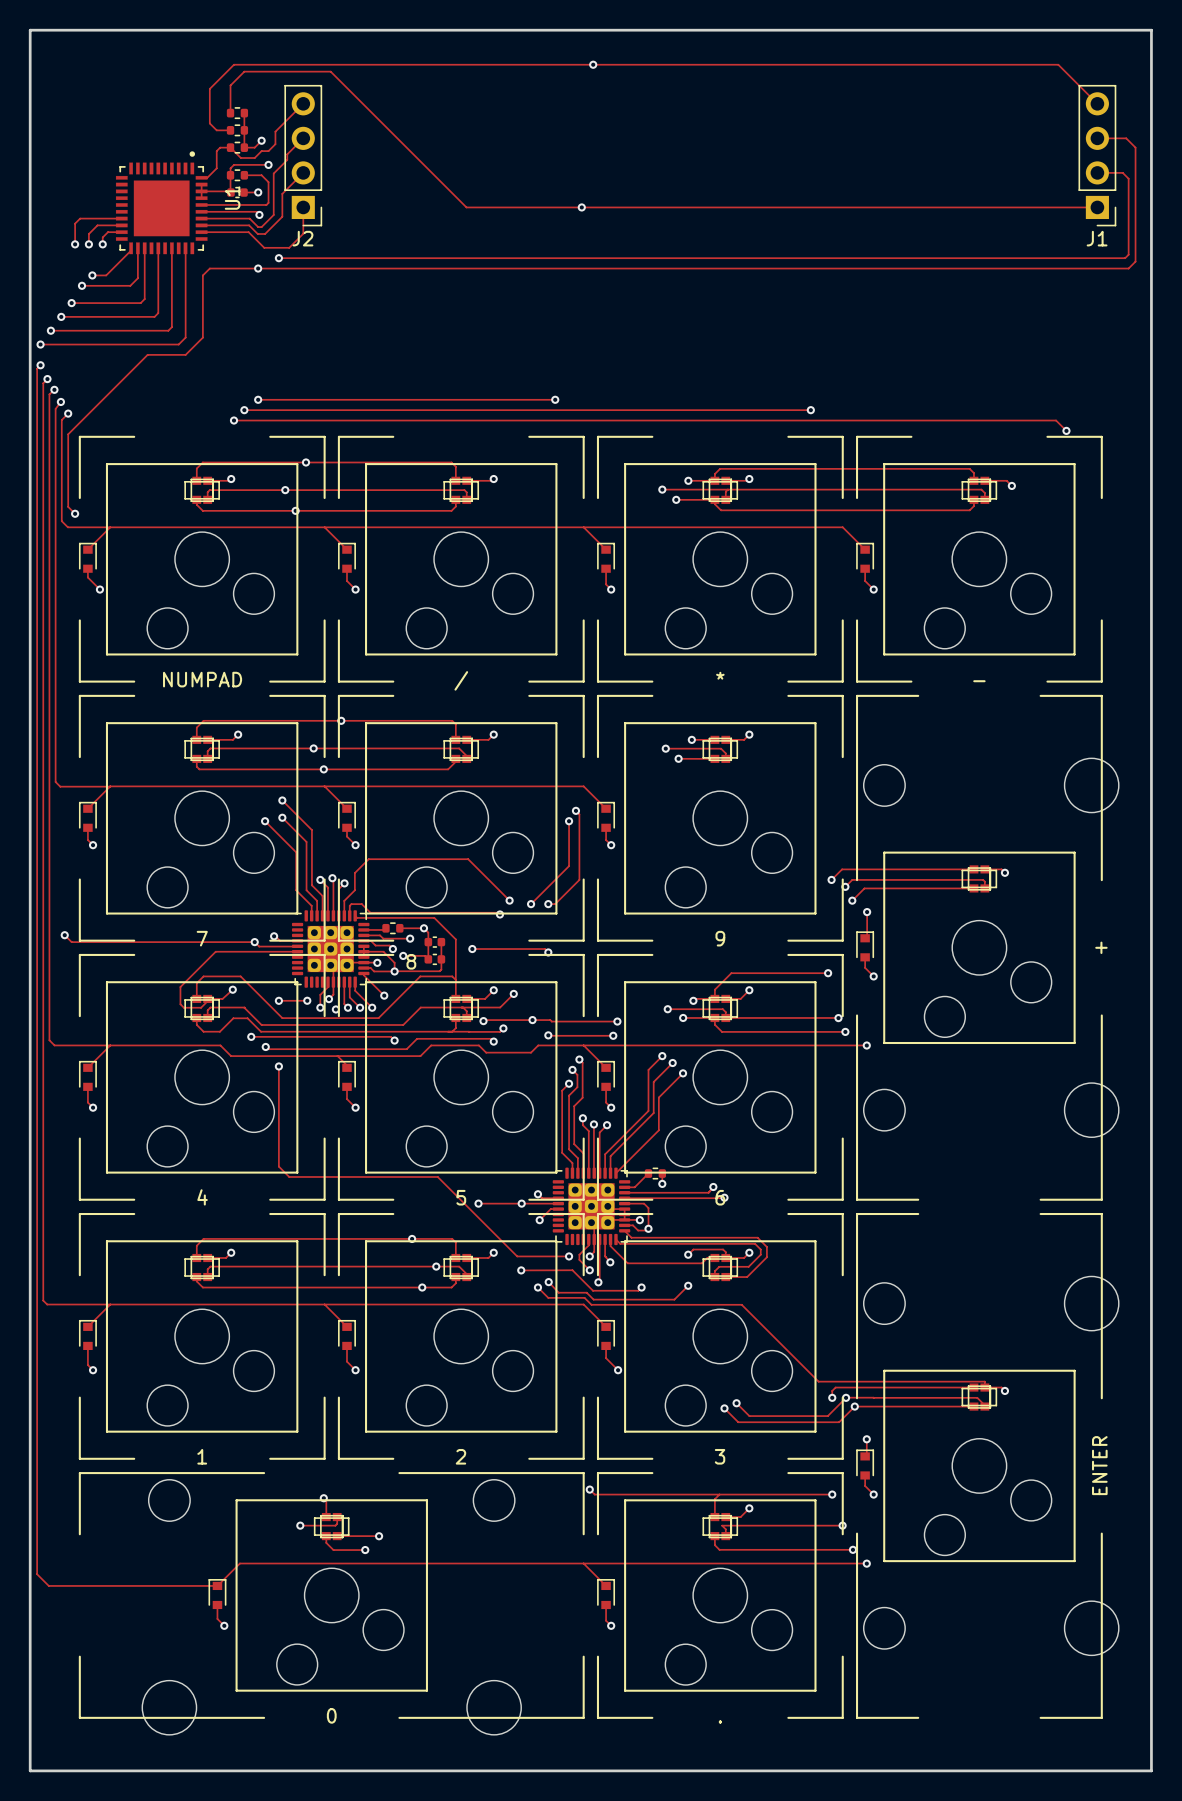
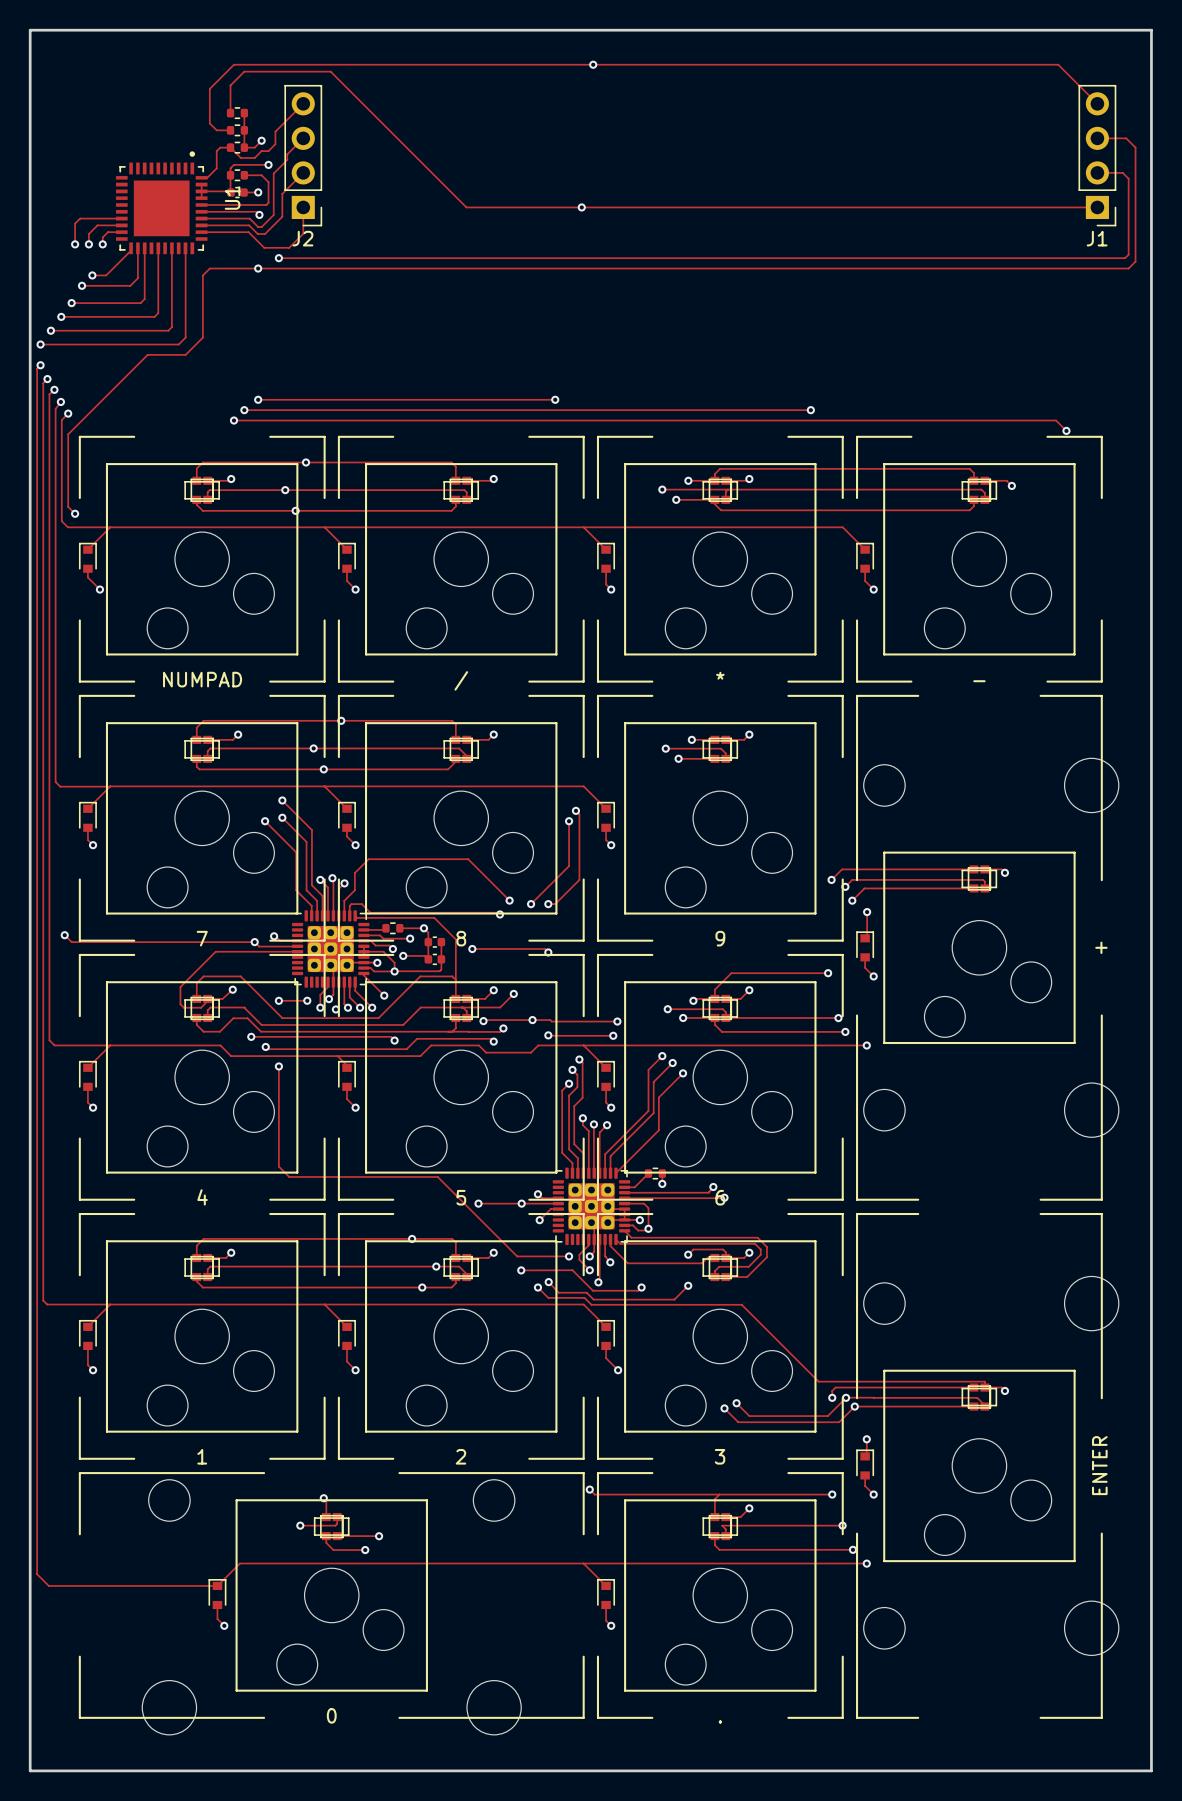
part value position: 8 (411, 961) -> 8 (461, 938)

